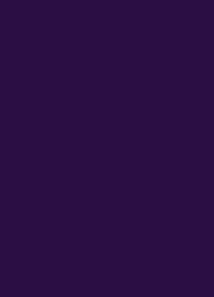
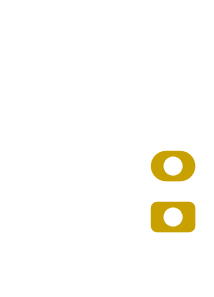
part: none -> (173, 191)

